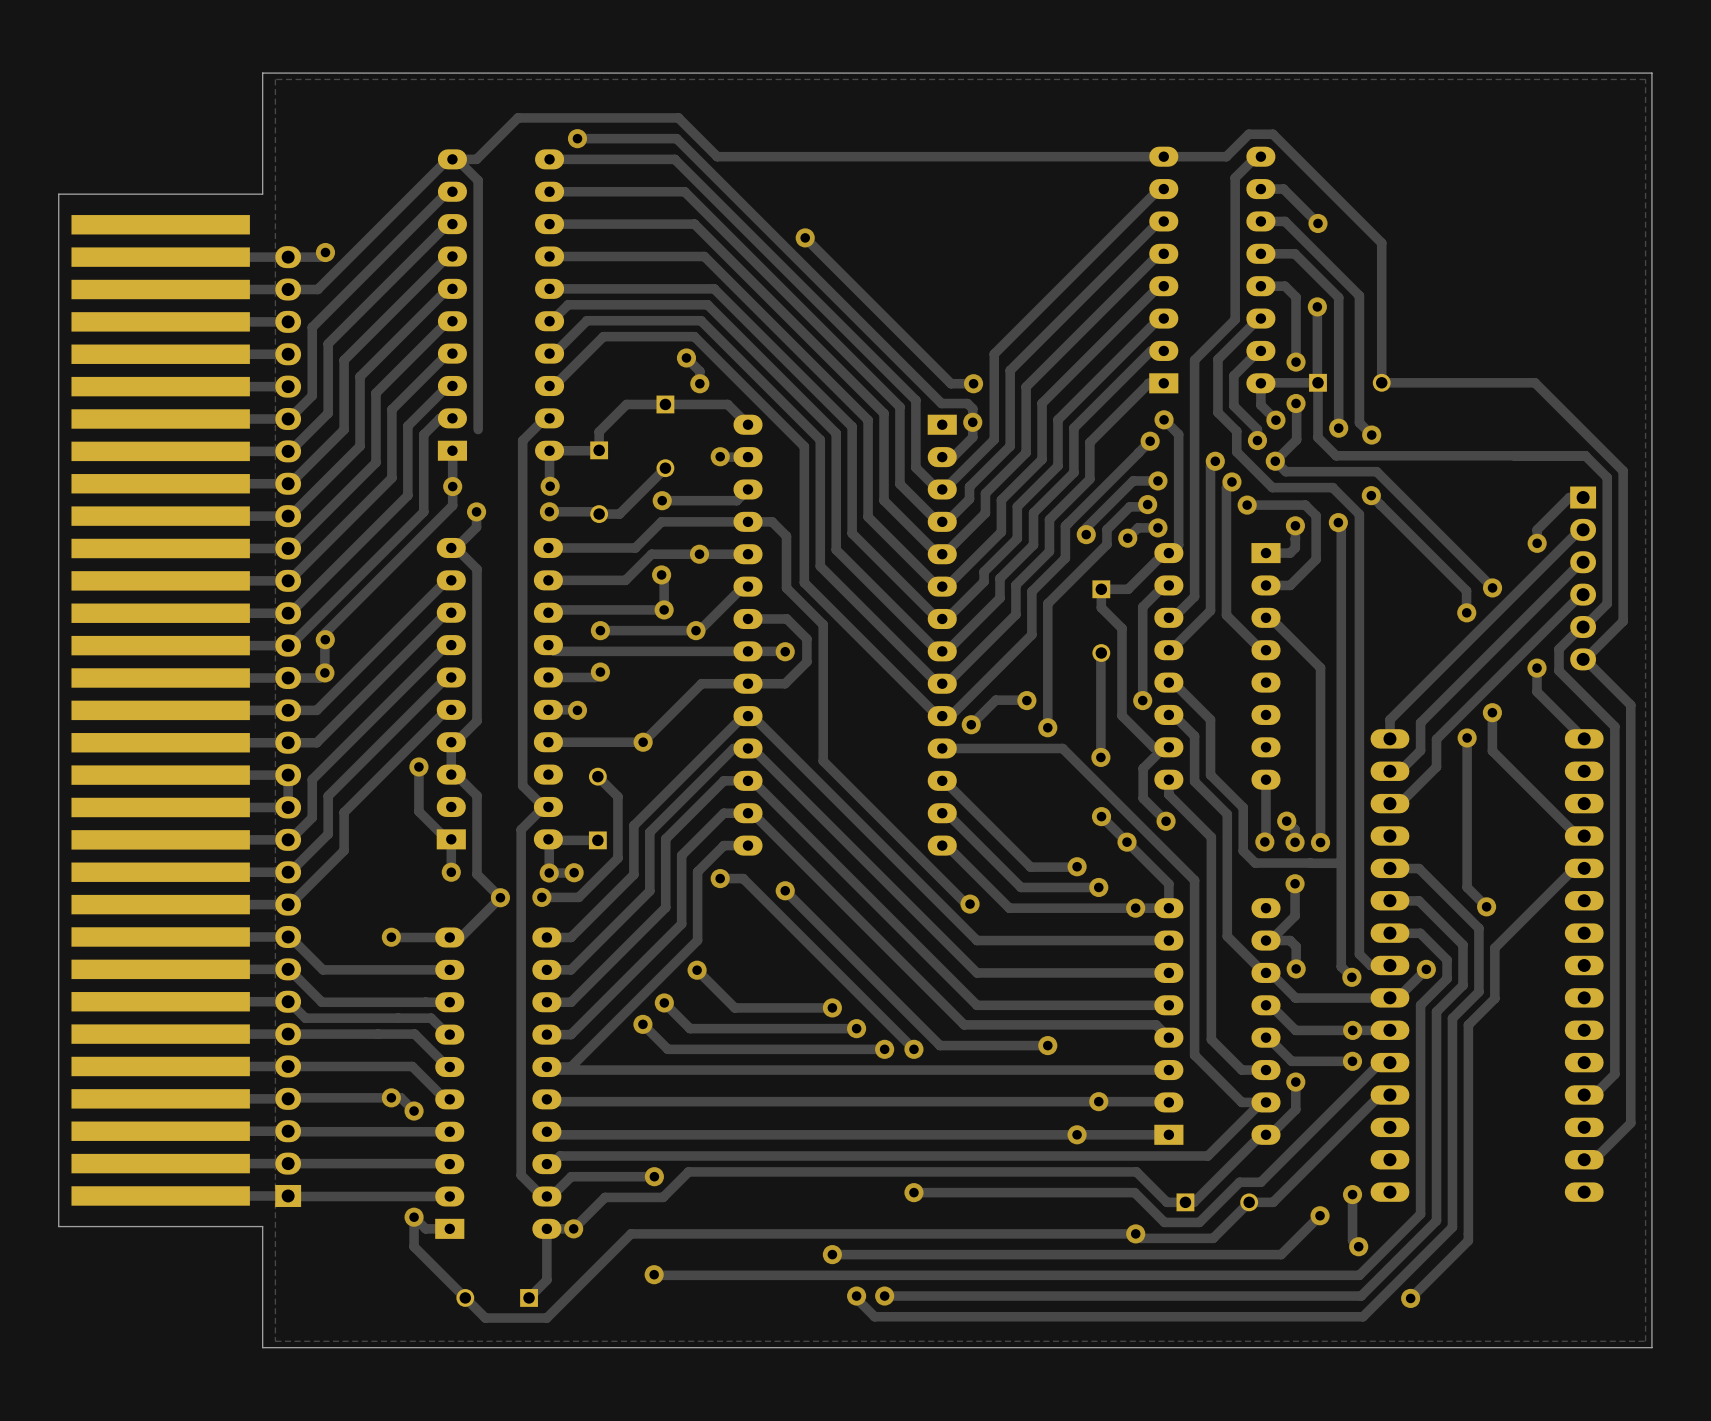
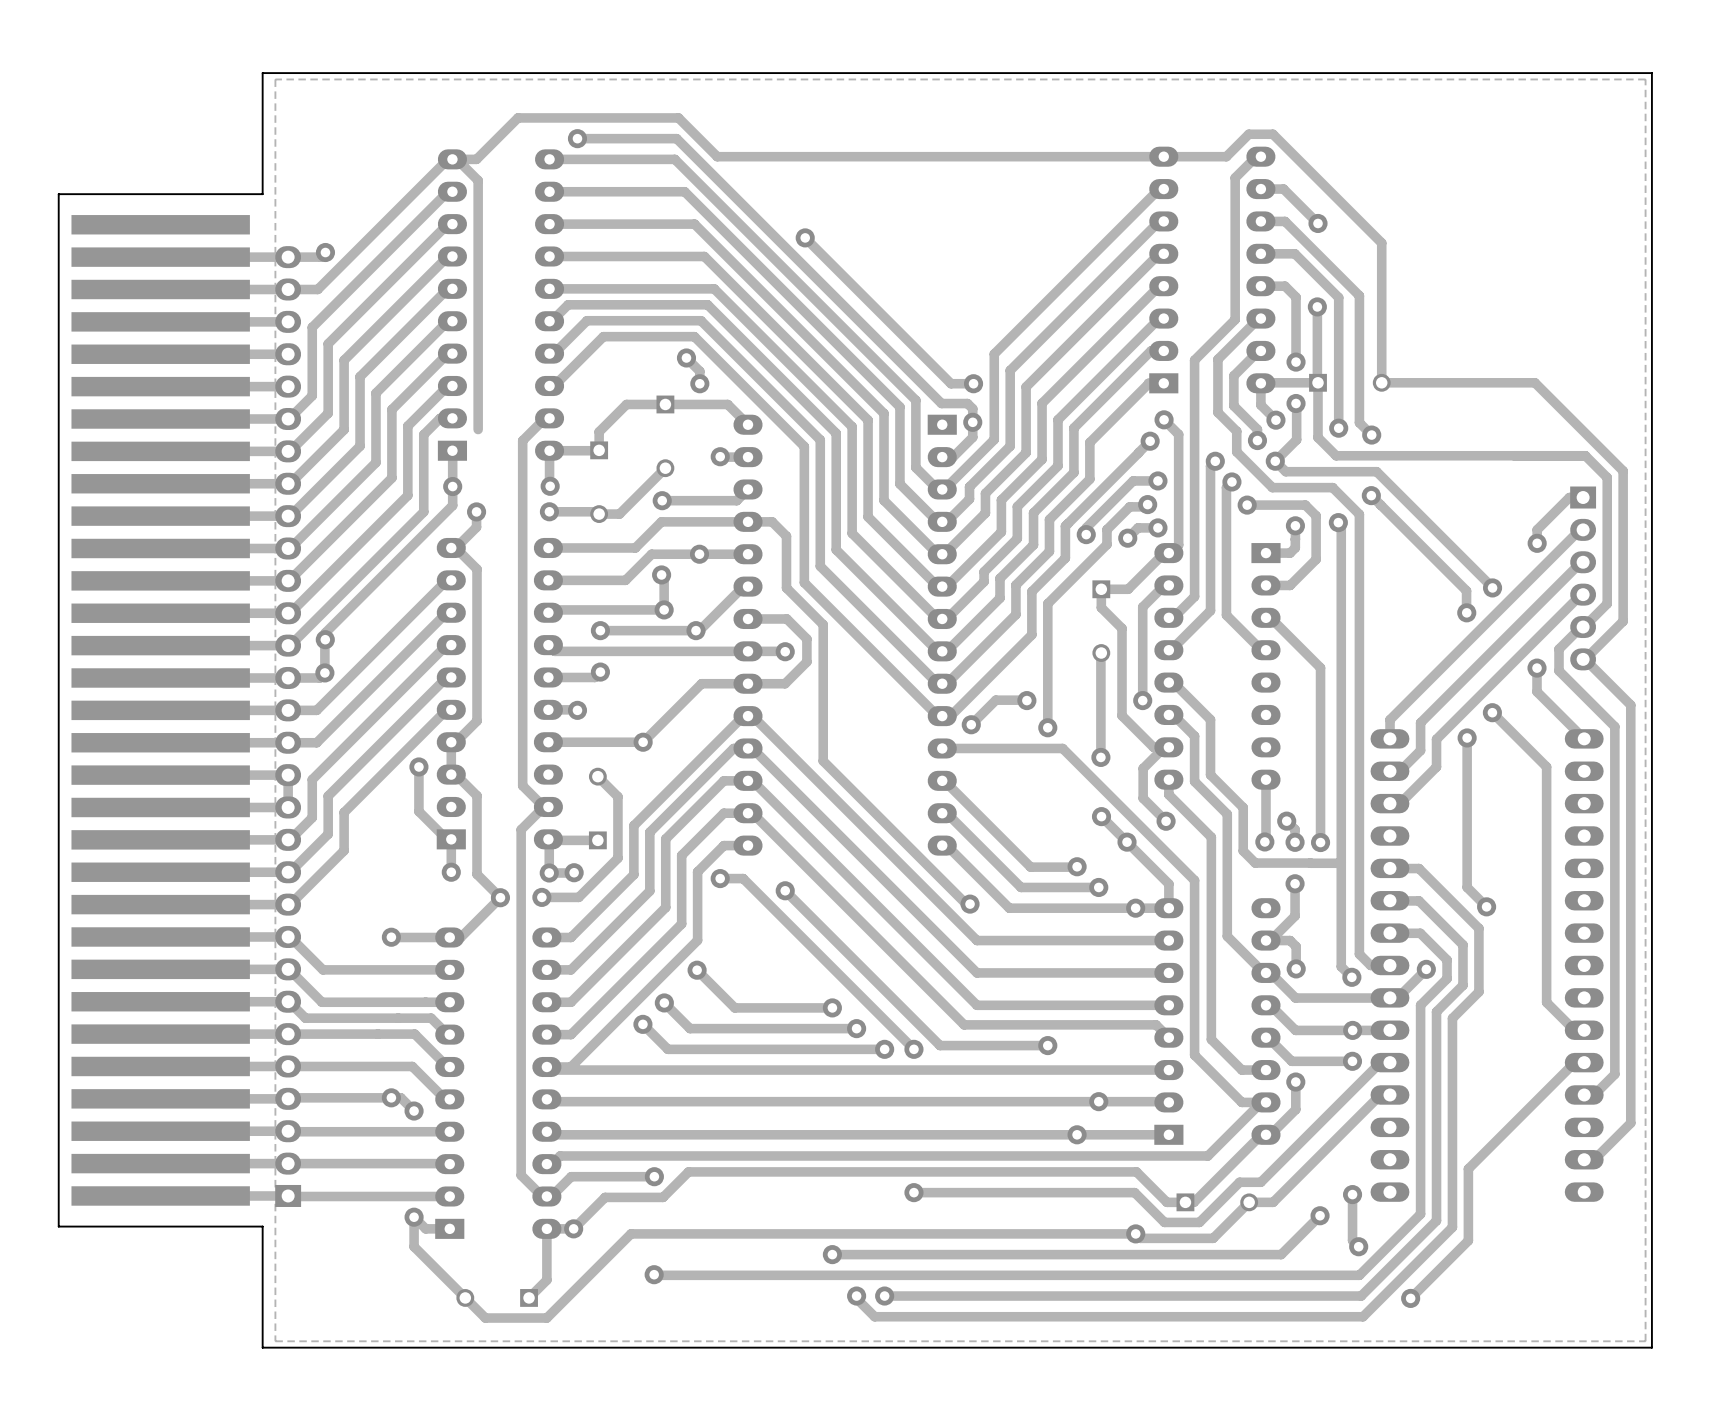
track: (1492, 712) (1492, 751) (1577, 835) (1584, 835) -> (1492, 712) (1546, 766) (1546, 1002) (1574, 1030) (1584, 1030)
track: (1584, 868) (1574, 868) (1494, 948) (1494, 998) (1468, 1025) (1468, 1168) -> (1584, 1062) (1574, 1062) (1468, 1168)

